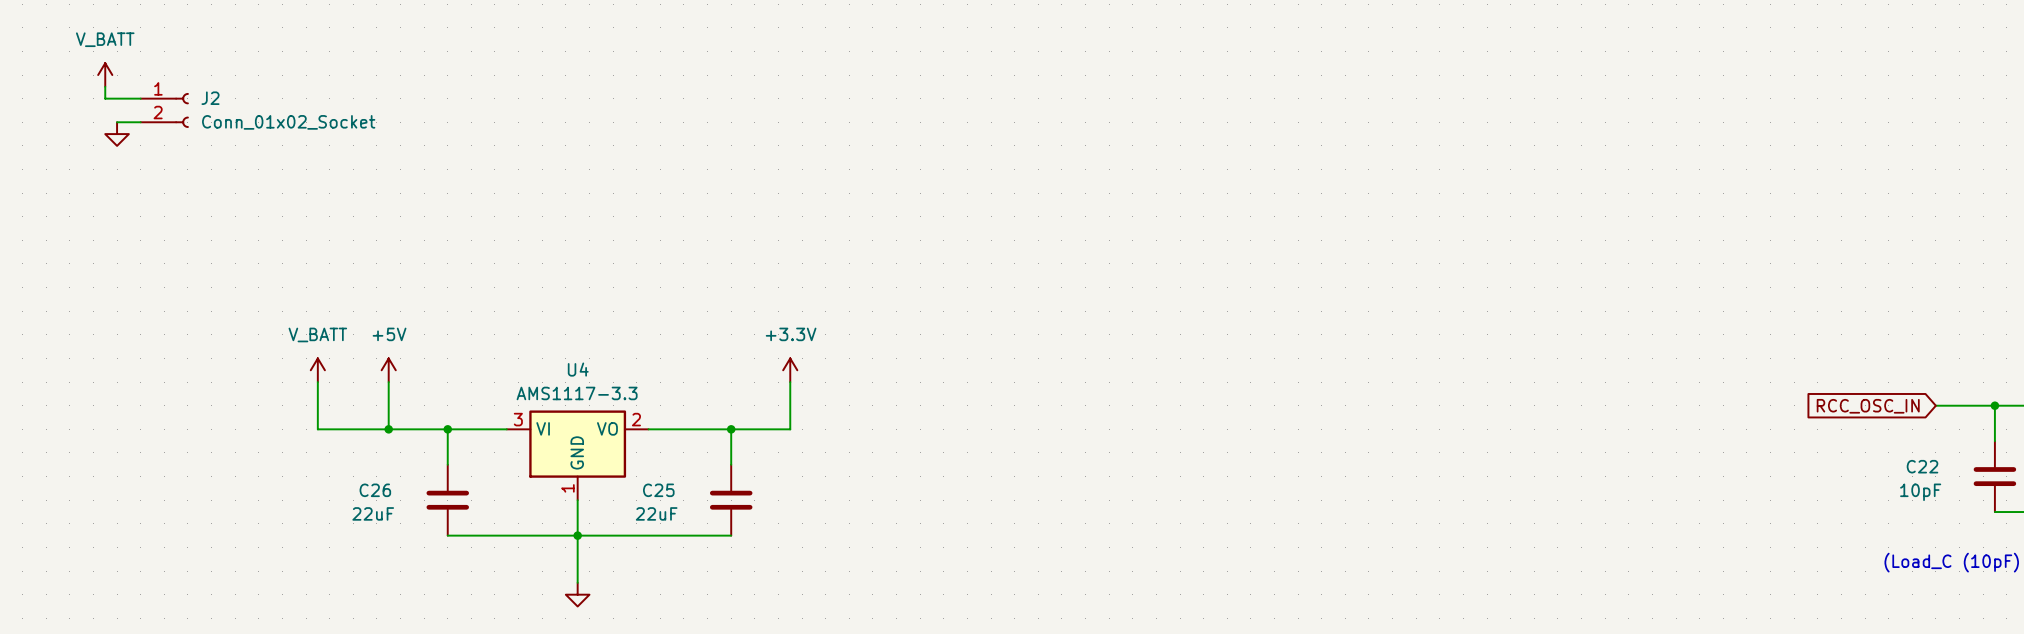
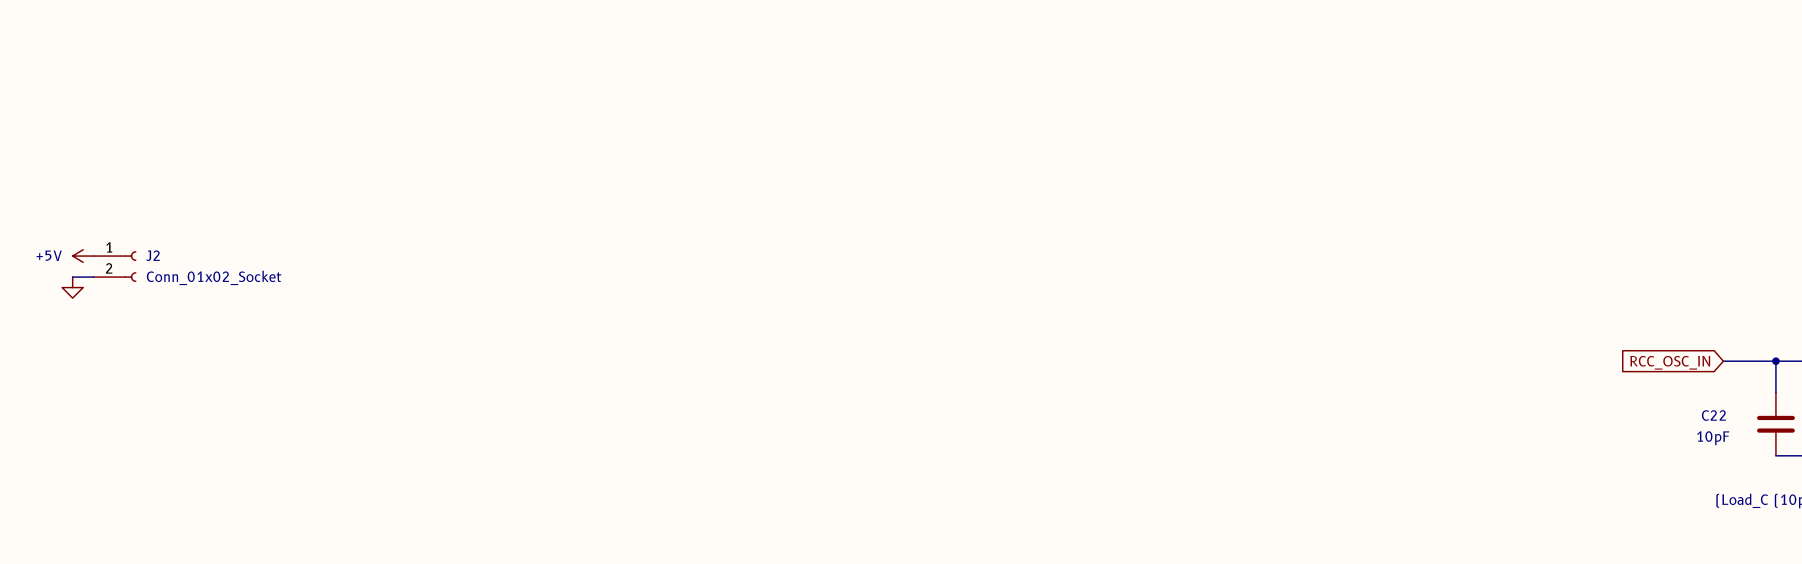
power symbol: V_BATT (105, 75) -> none
wire: (105, 86) (105, 98) (140, 98) -> none
J2 position: (164, 110) -> (115, 266)
wire: (117, 122) (140, 122) -> (72, 277) (93, 277)
power symbol position: (117, 134) -> (72, 287)
power symbol: none -> +5V (83, 256)
power symbol: V_BATT (317, 370) -> none
power symbol: +5V (388, 370) -> none
power symbol: +3.3V (790, 370) -> none
wire: (317, 382) (317, 429) (506, 429) -> none
wire: (388, 382) (388, 429) -> none
wire: (790, 382) (790, 429) (648, 429) -> none
junction: (388, 429) -> none
wire: (447, 429) (447, 464) -> none
junction: (447, 429) -> none
wire: (731, 429) (731, 464) -> none
junction: (731, 429) -> none
U4: AMS1117-3.3 (577, 455) -> none
C26: 22uF (447, 500) -> none
wire: (577, 500) (577, 582) -> none
C25: 22uF (731, 500) -> none
wire: (447, 535) (731, 535) -> none
junction: (577, 535) -> none
power symbol: (577, 594) -> none

